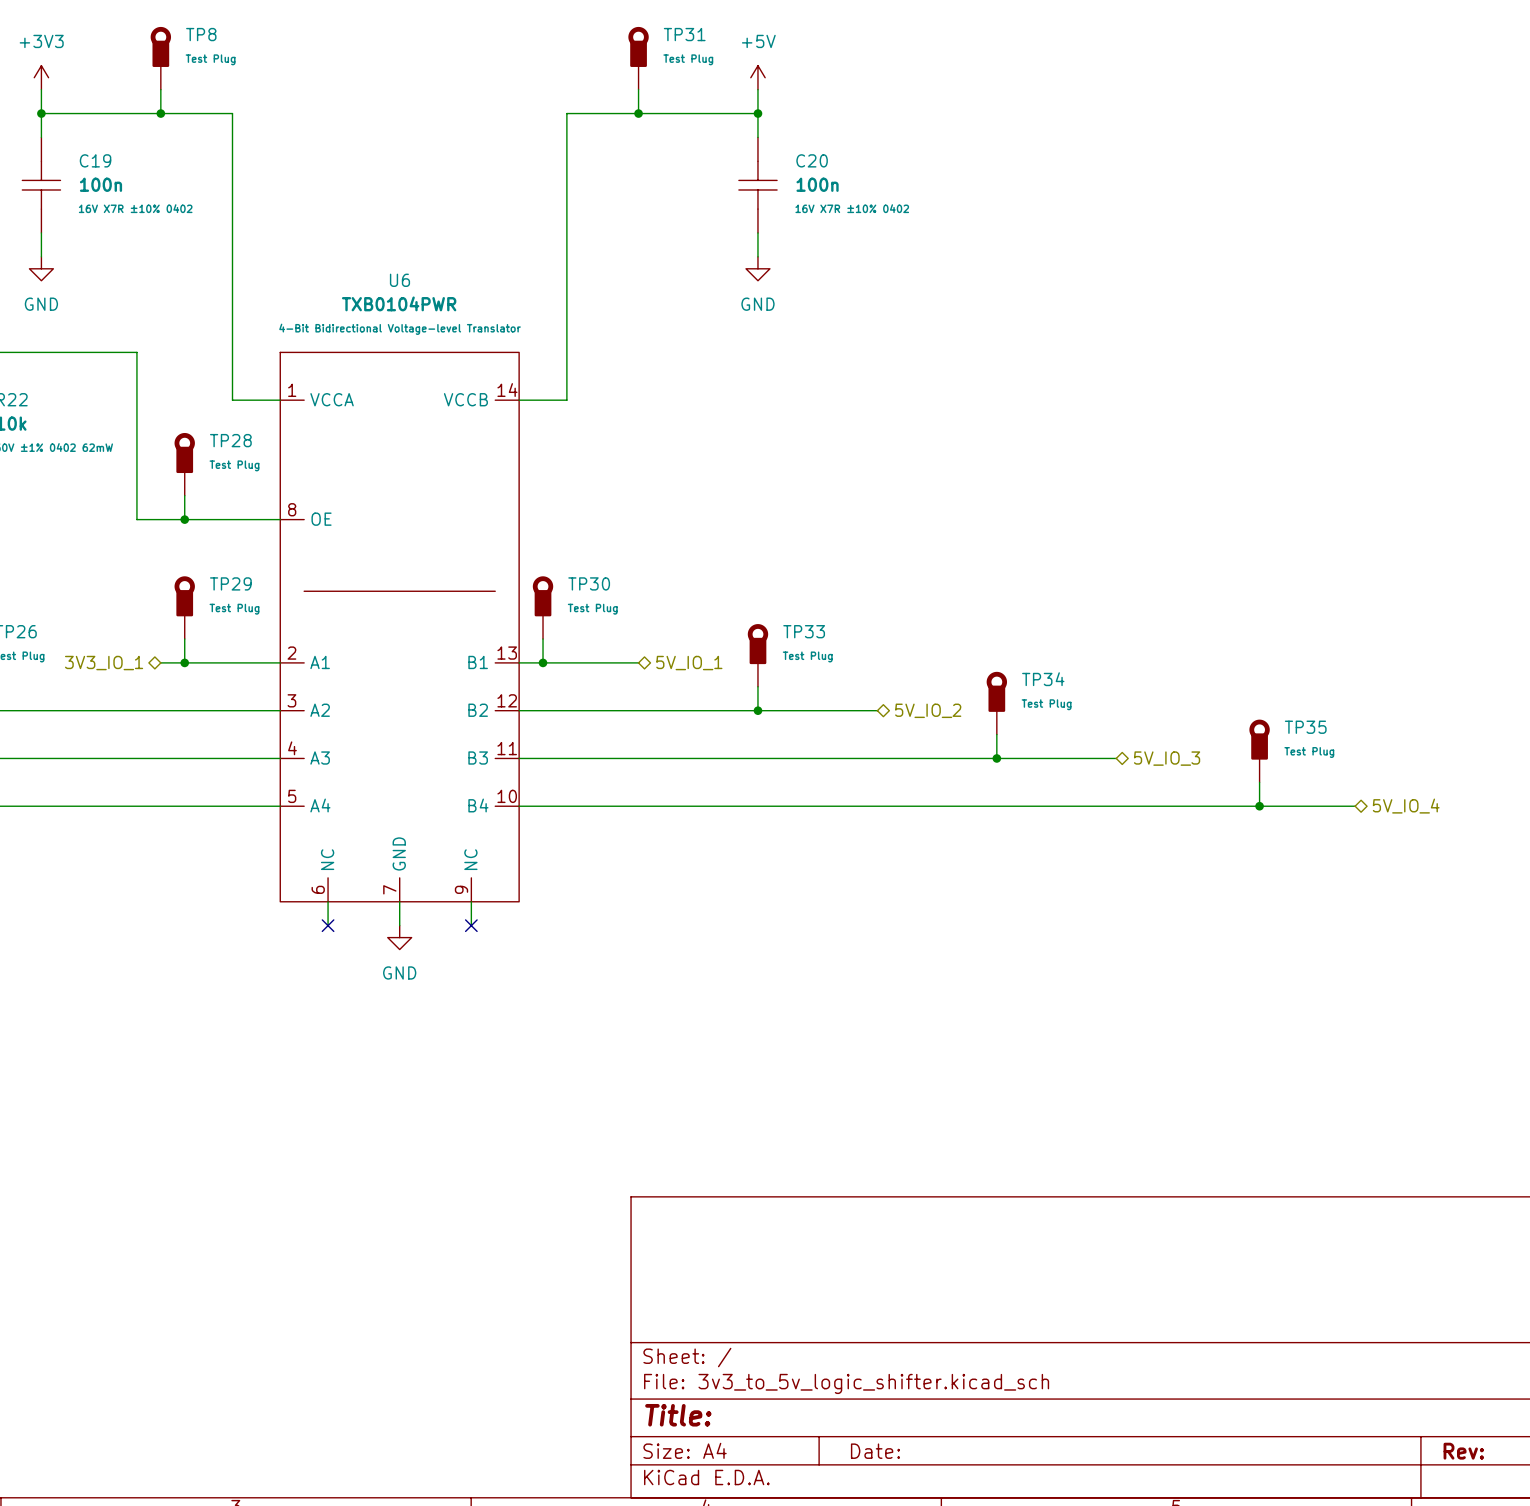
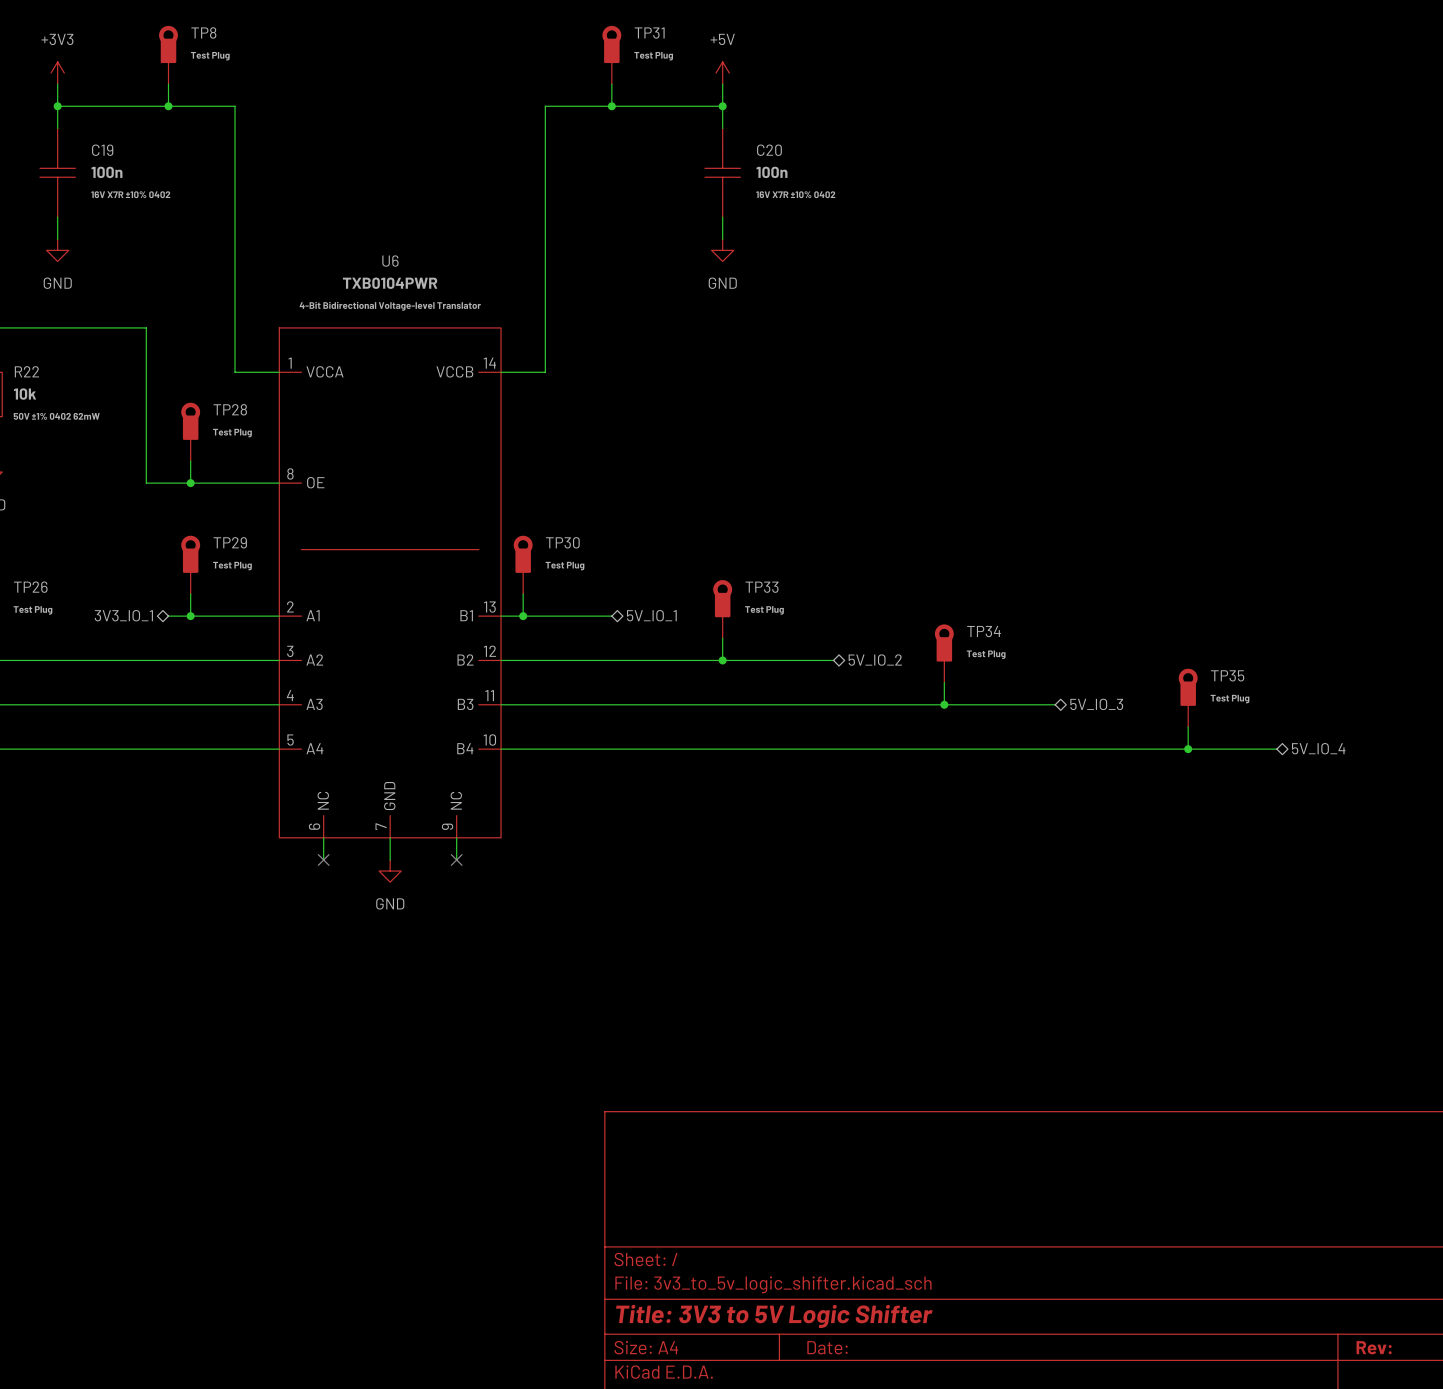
title block: Title: (678, 1415) -> Title: 3V3 to 5V Logic Shifter (774, 1316)

